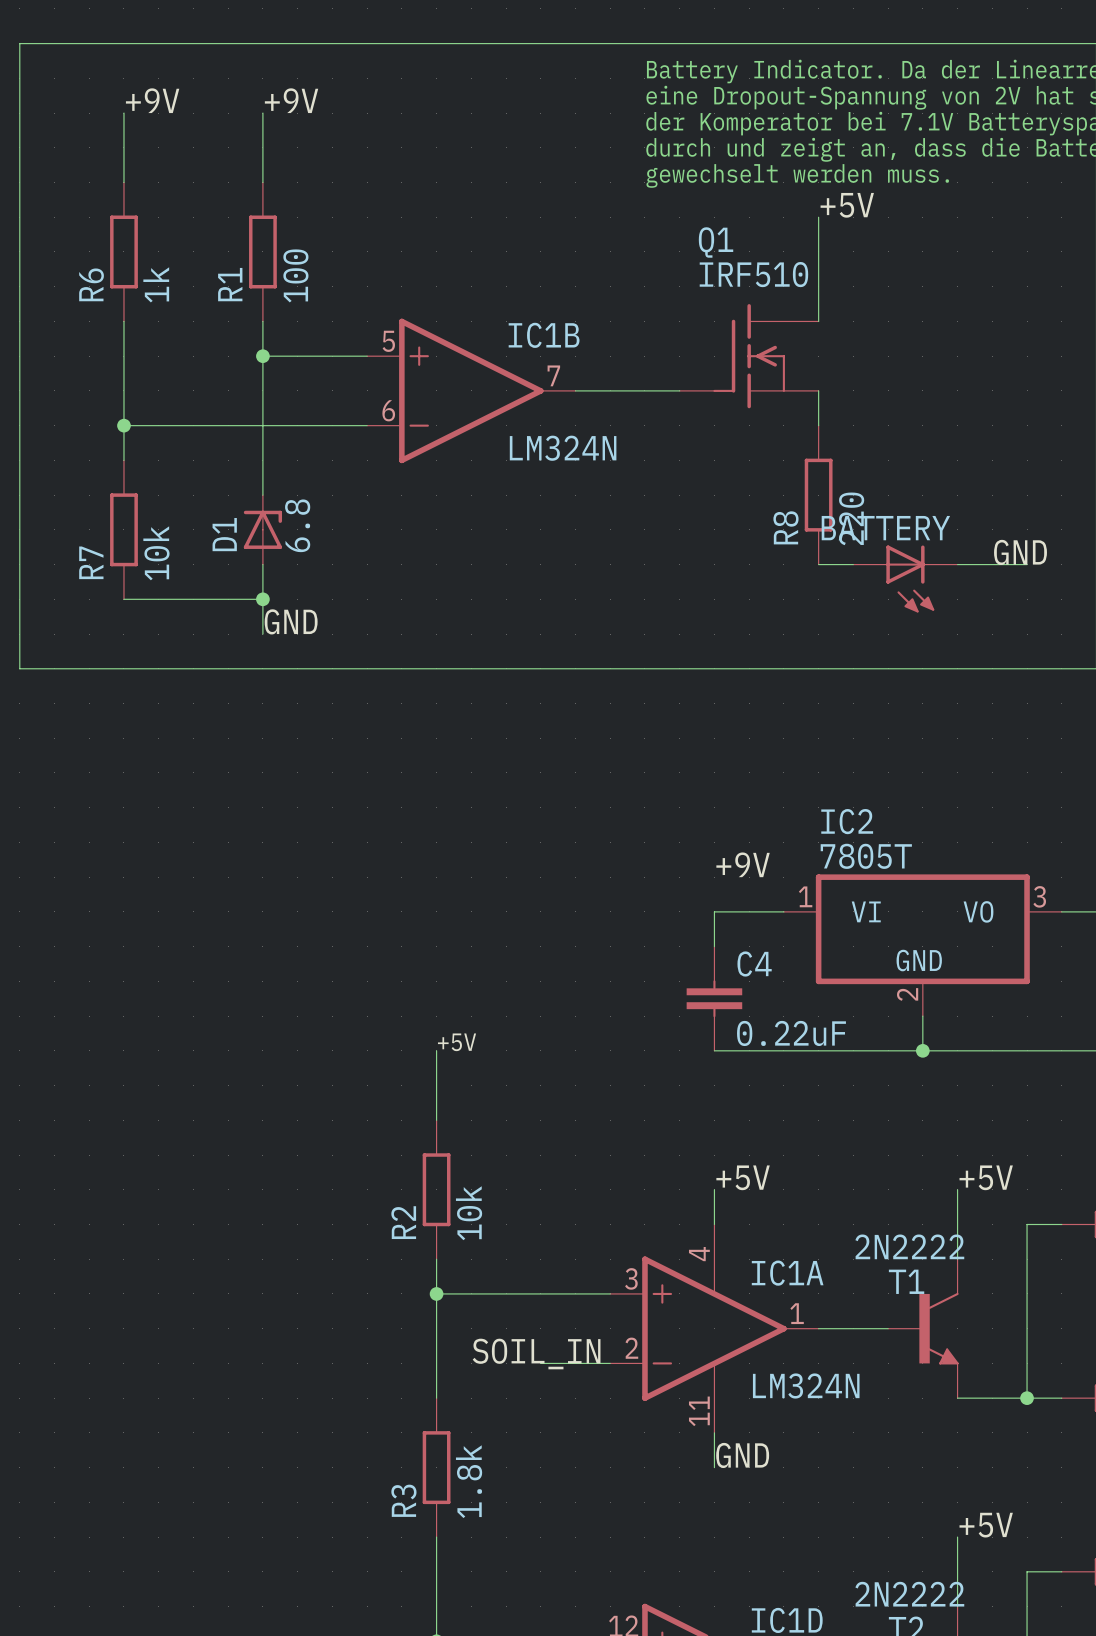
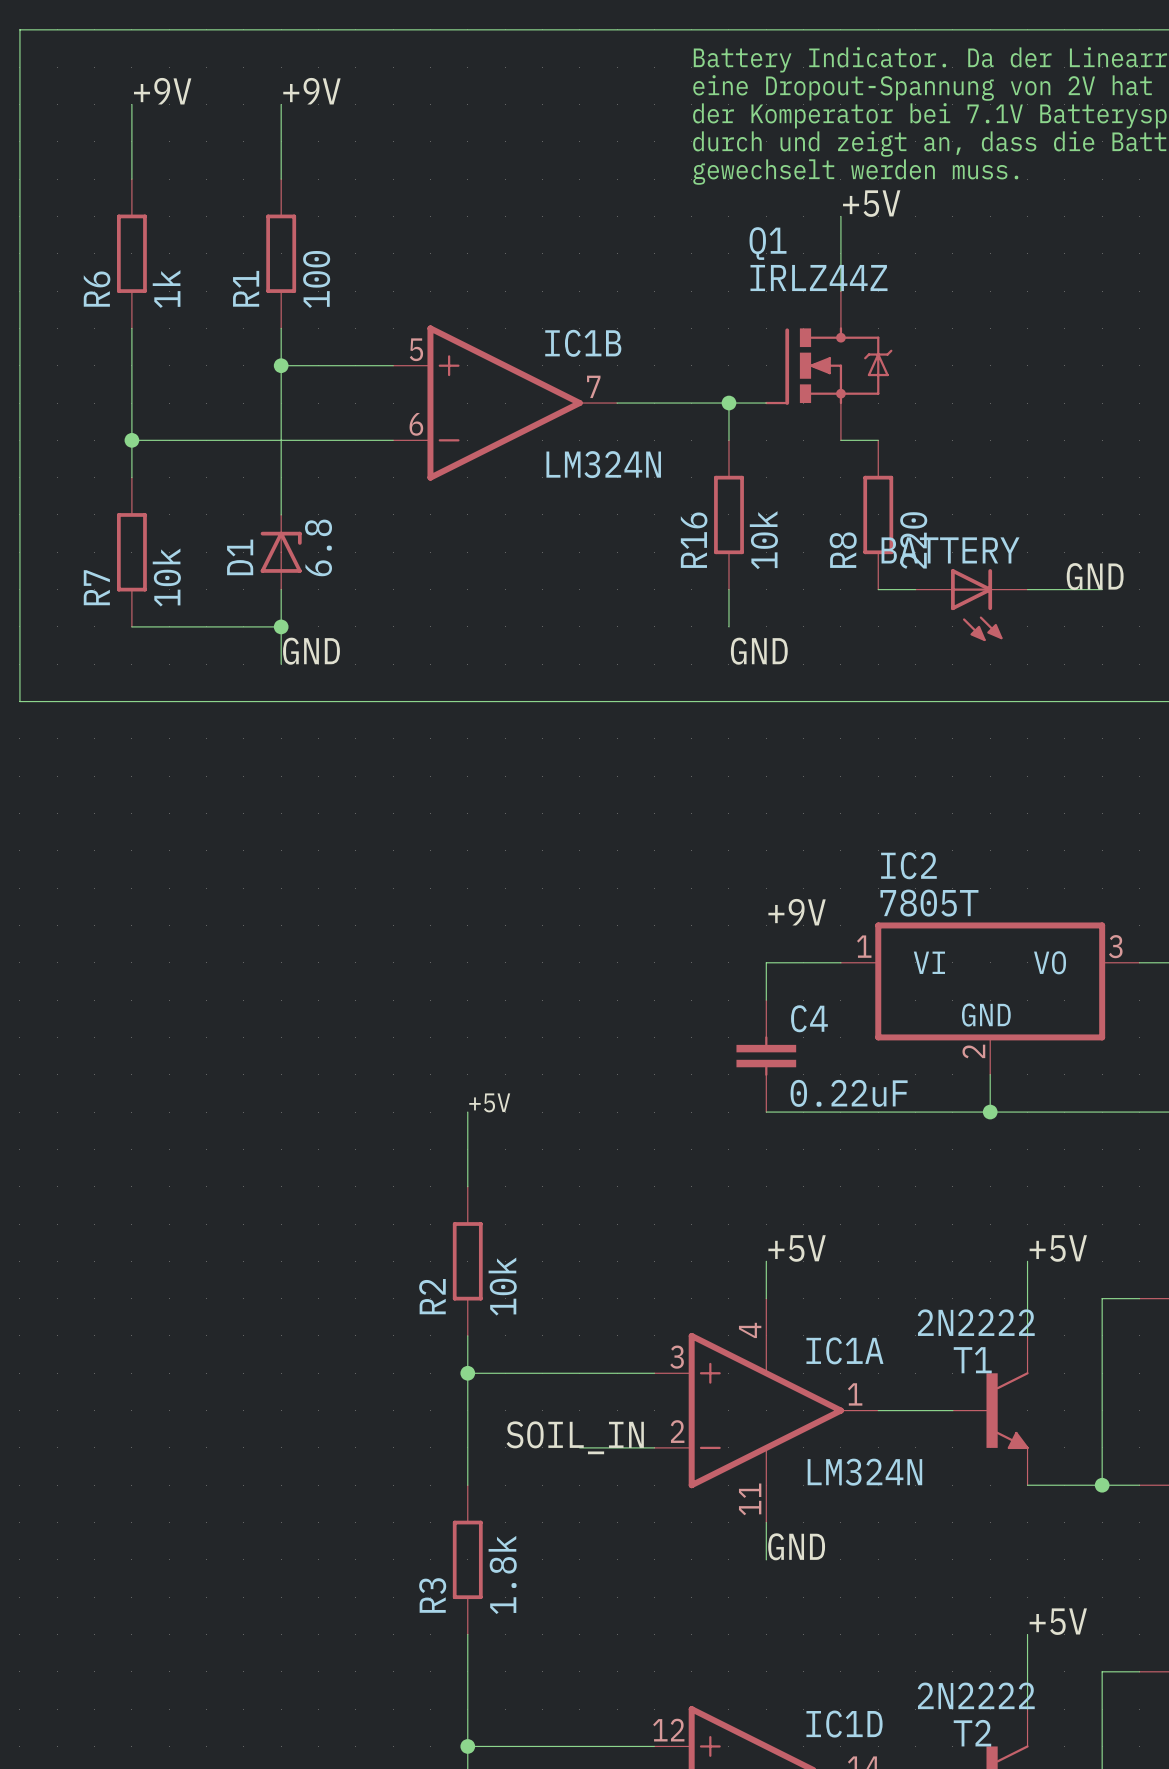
label position: +5V (847, 205) -> +5V (871, 203)
wire: none -> (840, 216) (840, 291)
wire: (818, 217) (818, 321) -> none
Q1 value: IRF510 (753, 274) -> IRLZ44Z (818, 278)
Q1 symbol: [679, 304, 819, 409] -> [765, 291, 893, 441]
junction: none -> (728, 403)
wire: none -> (766, 403) (728, 403) (728, 440)
wire: (818, 390) (818, 425) -> (840, 440) (878, 440)
R16: none -> 10k (728, 514)
wire: none -> (728, 589) (728, 626)
label: none -> GND (759, 651)

